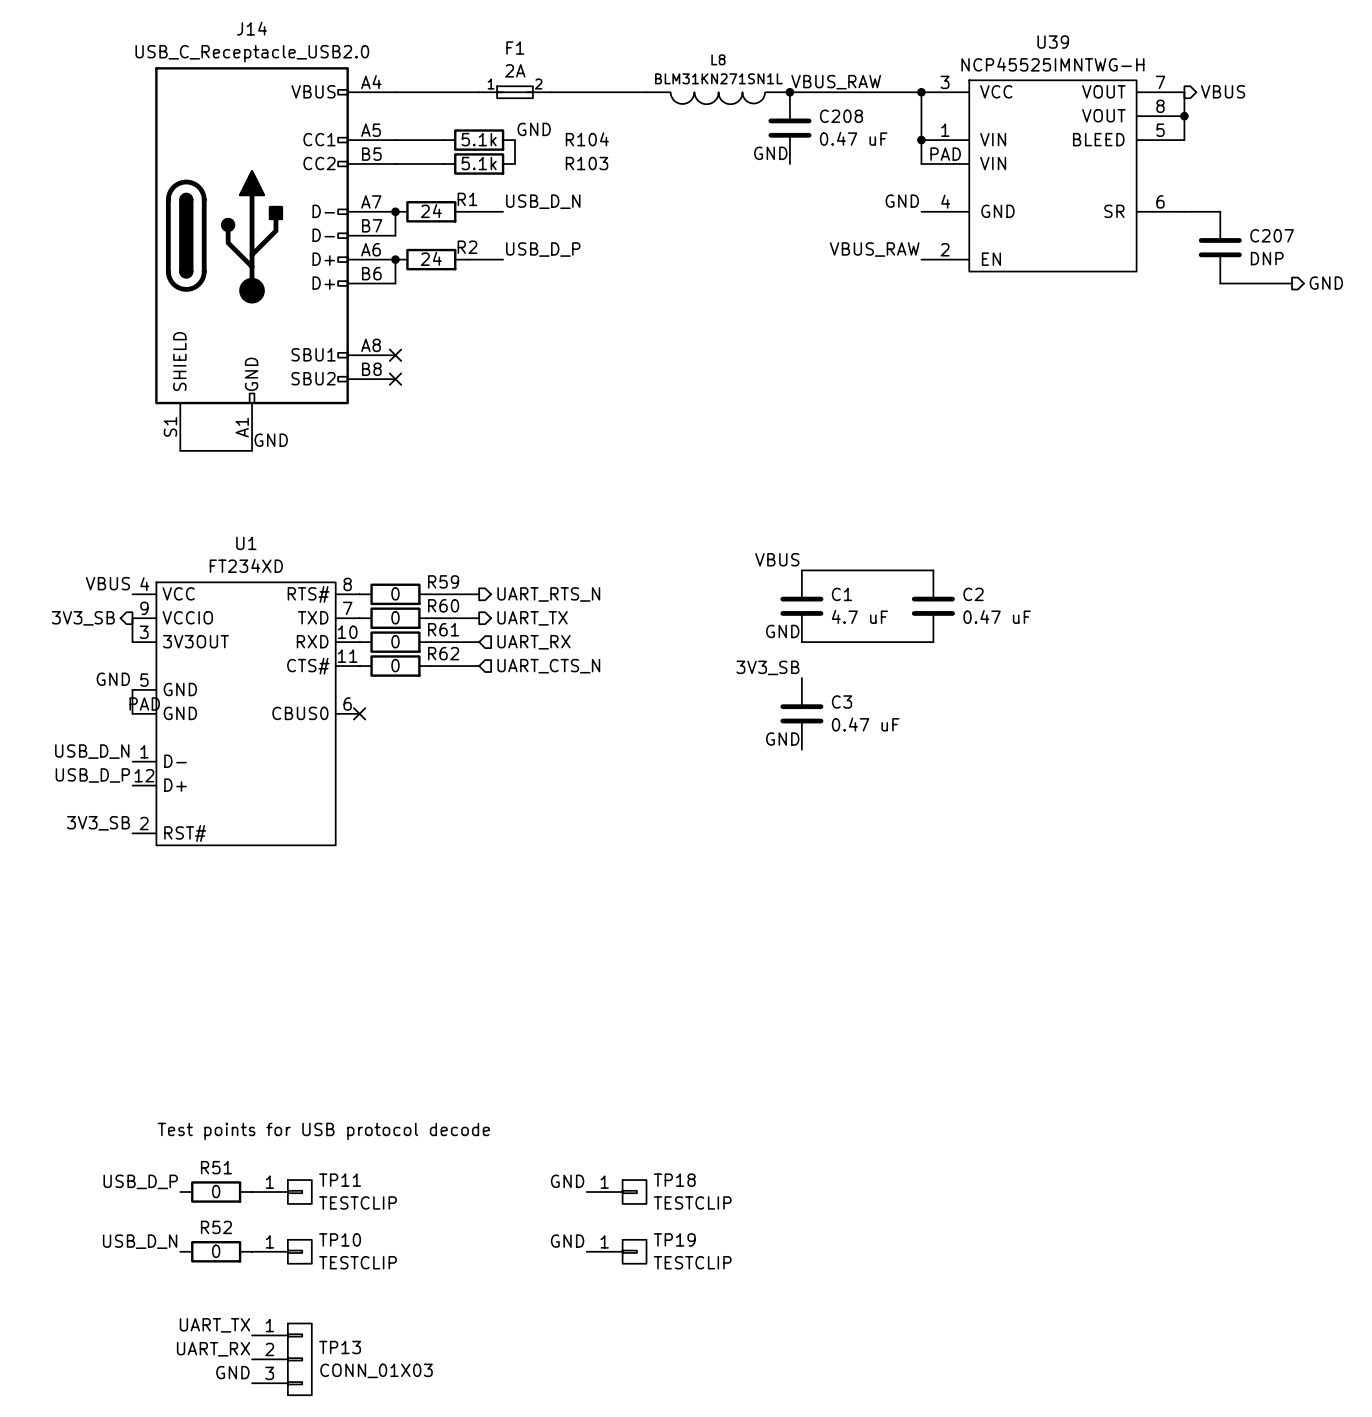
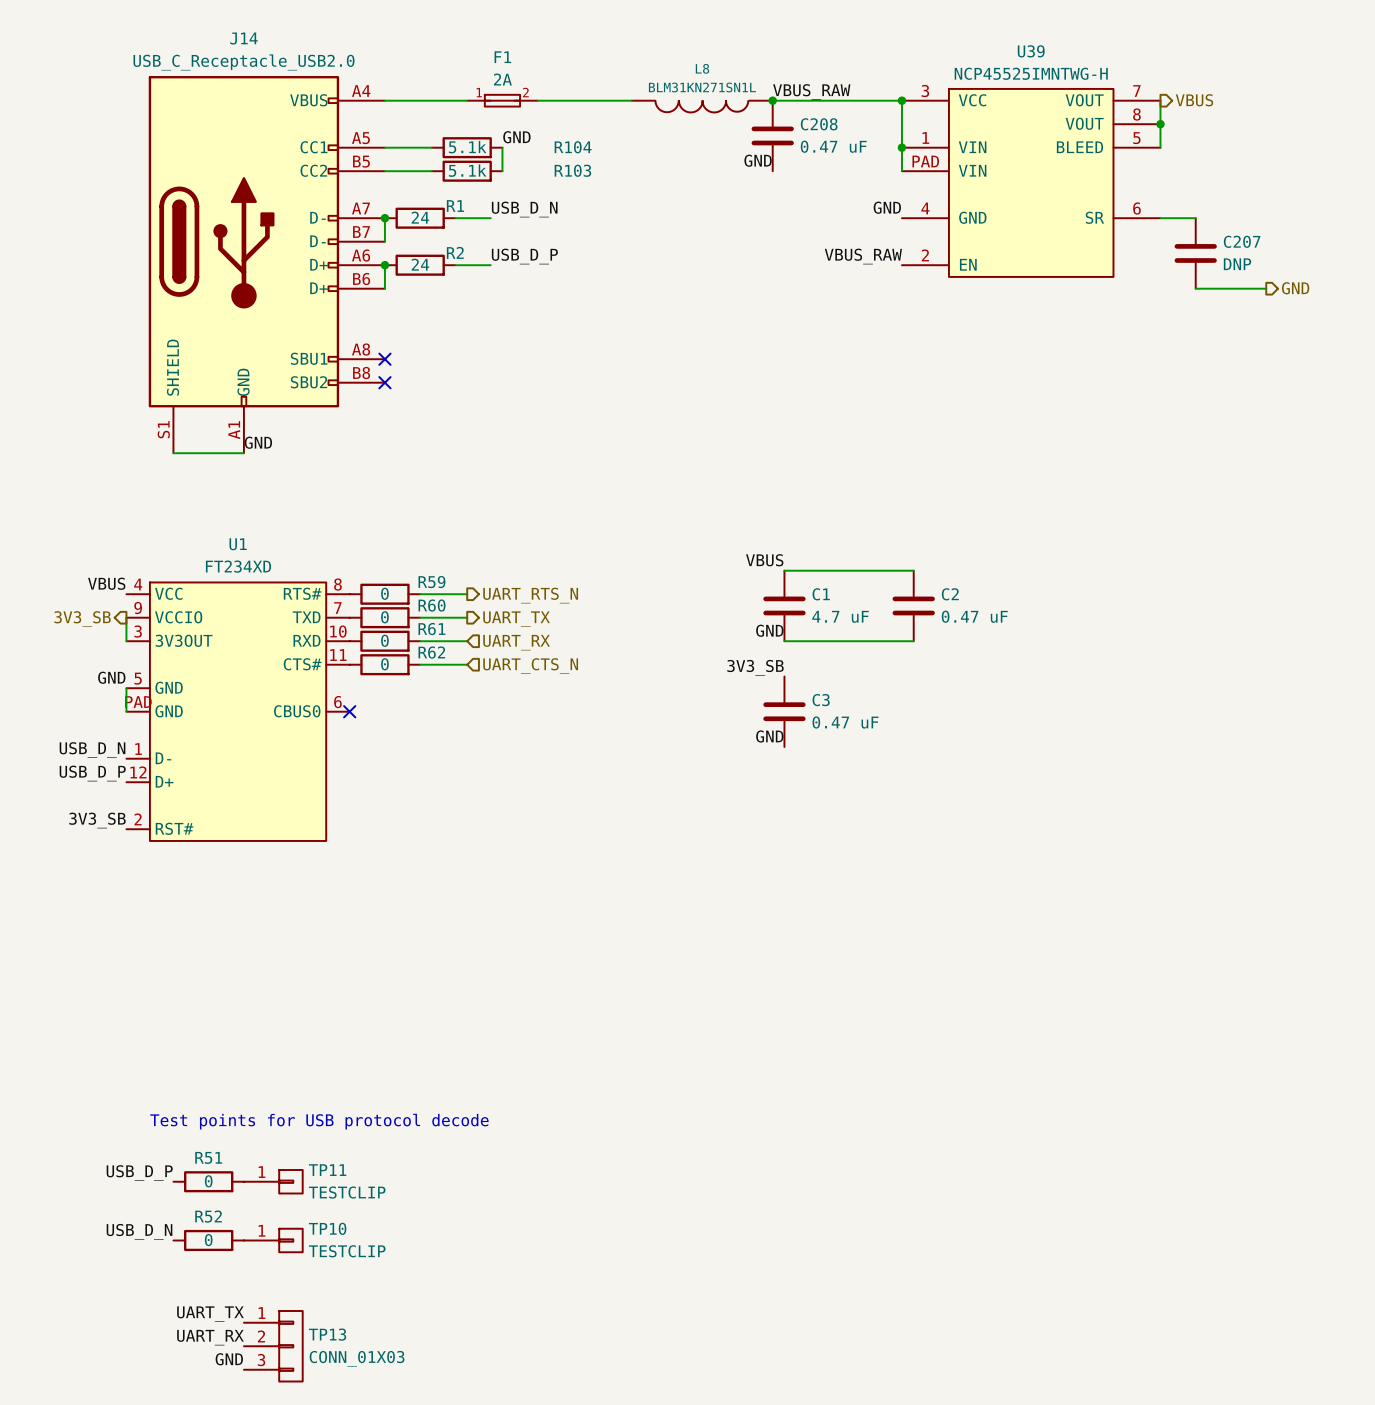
label: GND (567, 1181) -> none
TP18: TESTCLIP (616, 1192) -> none
label: GND (567, 1241) -> none
TP19: TESTCLIP (616, 1251) -> none

